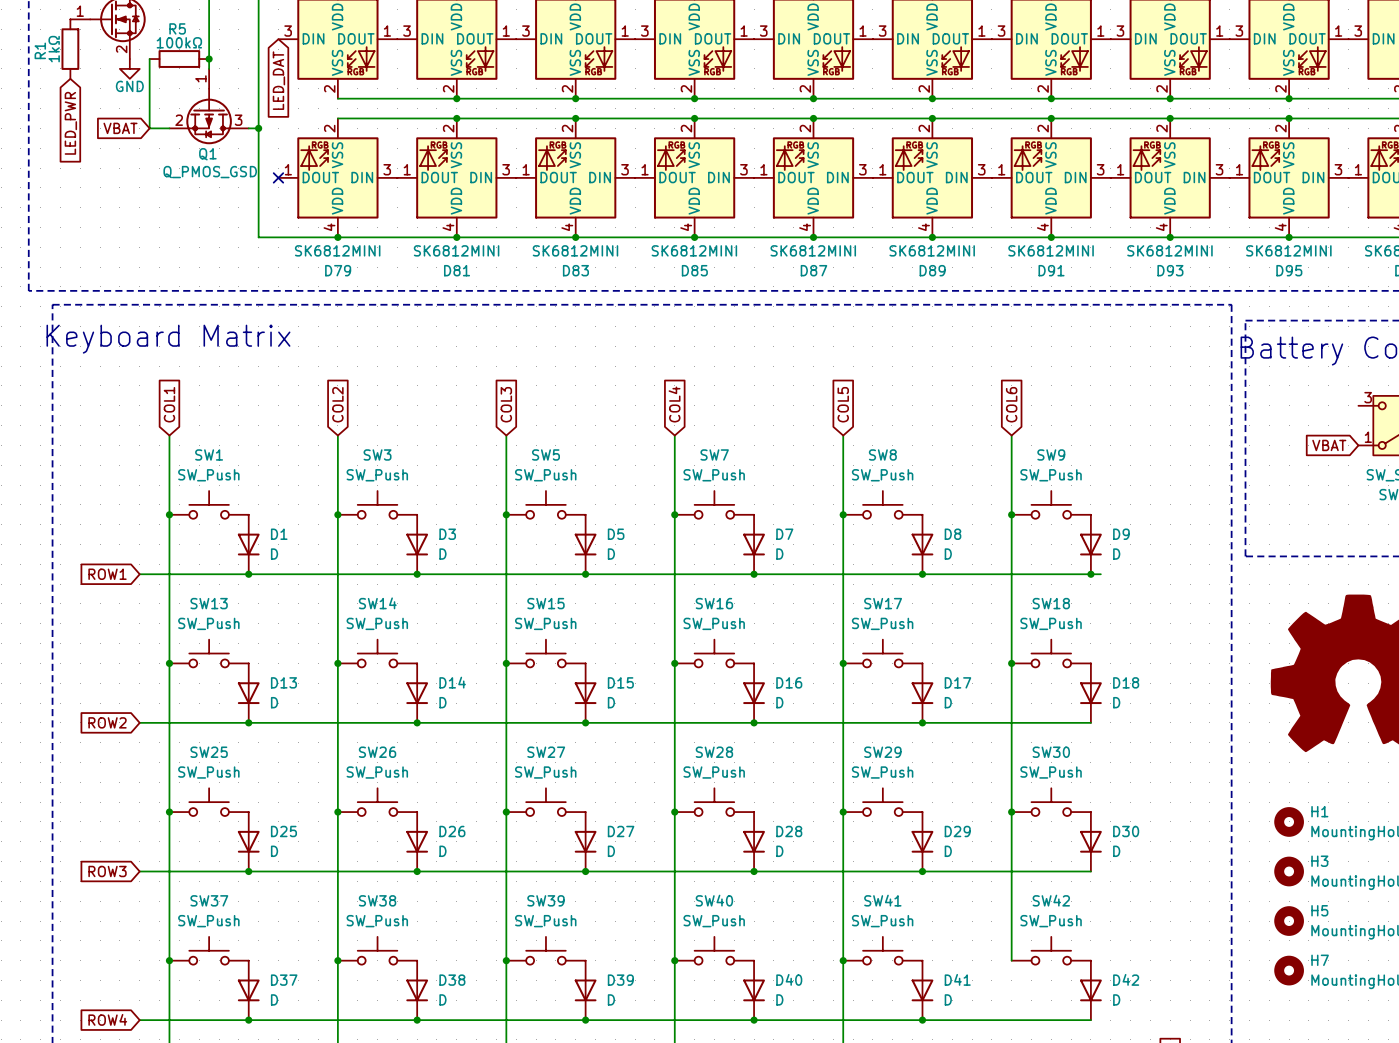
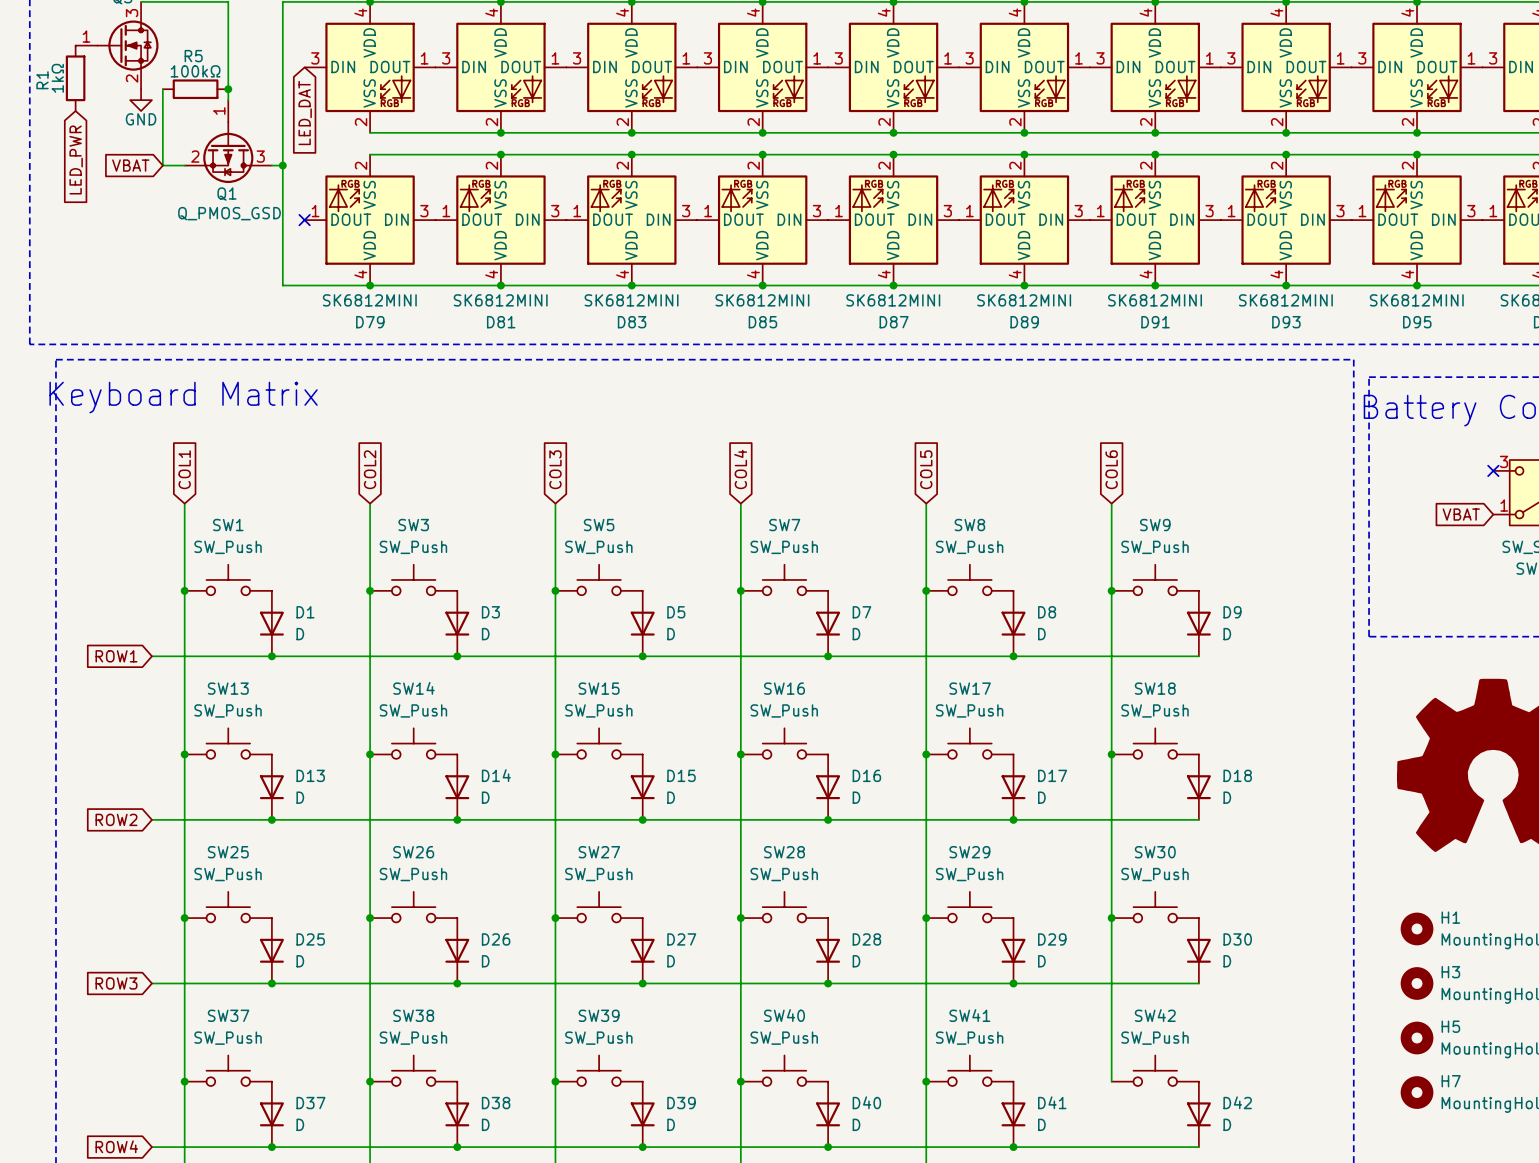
no-connect mark: none -> (1493, 470)
wire: (1090, 574) (1100, 574) -> none
junction: (1090, 574) -> none

